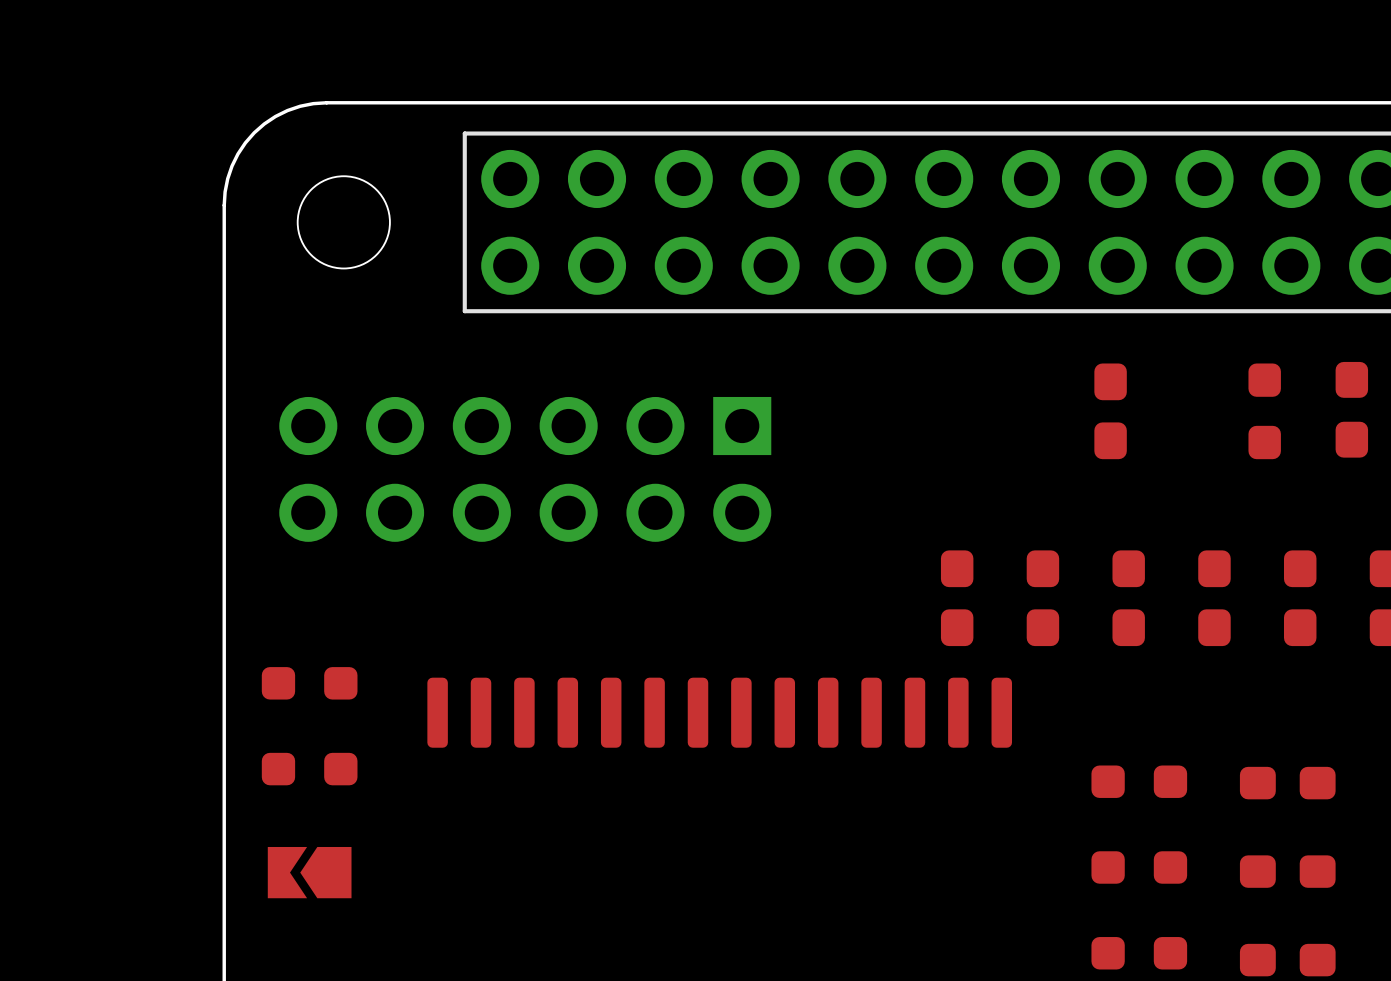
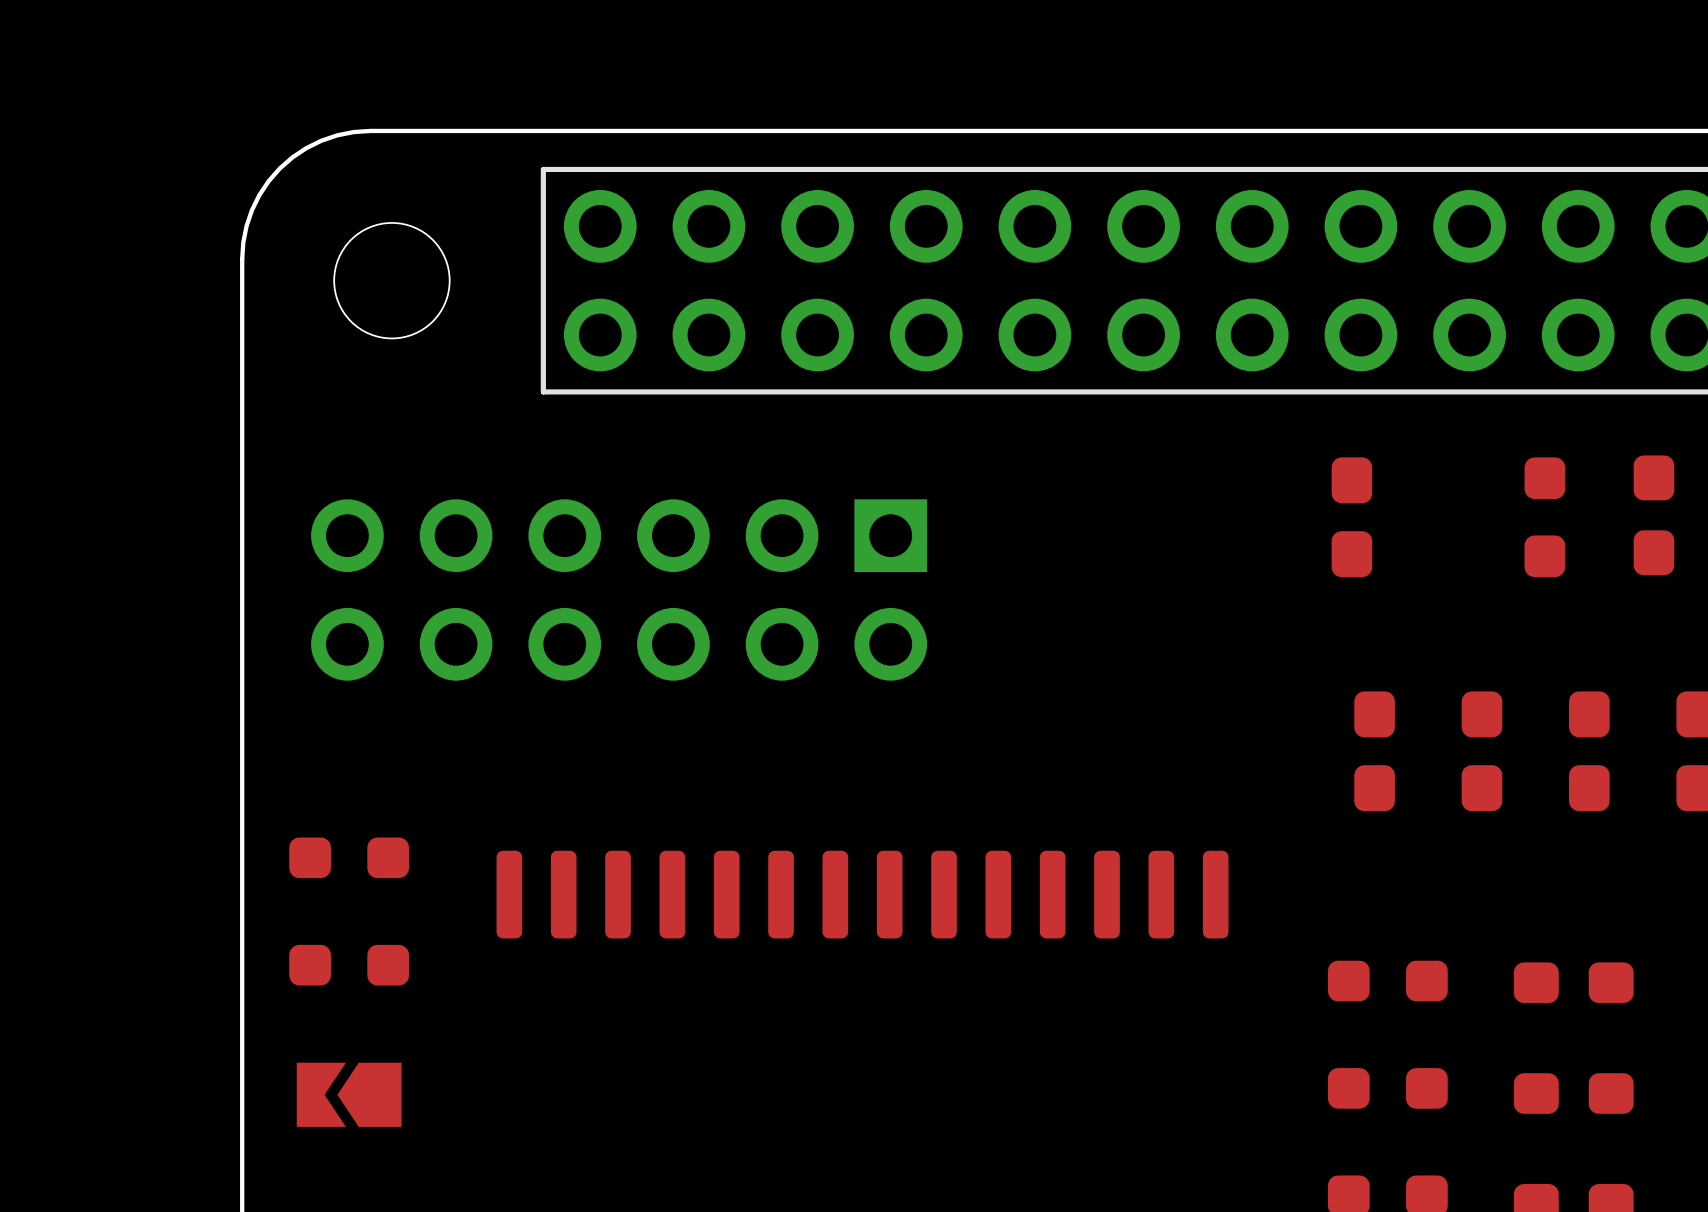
part: (957, 598) -> none
part: (1042, 598) -> none

